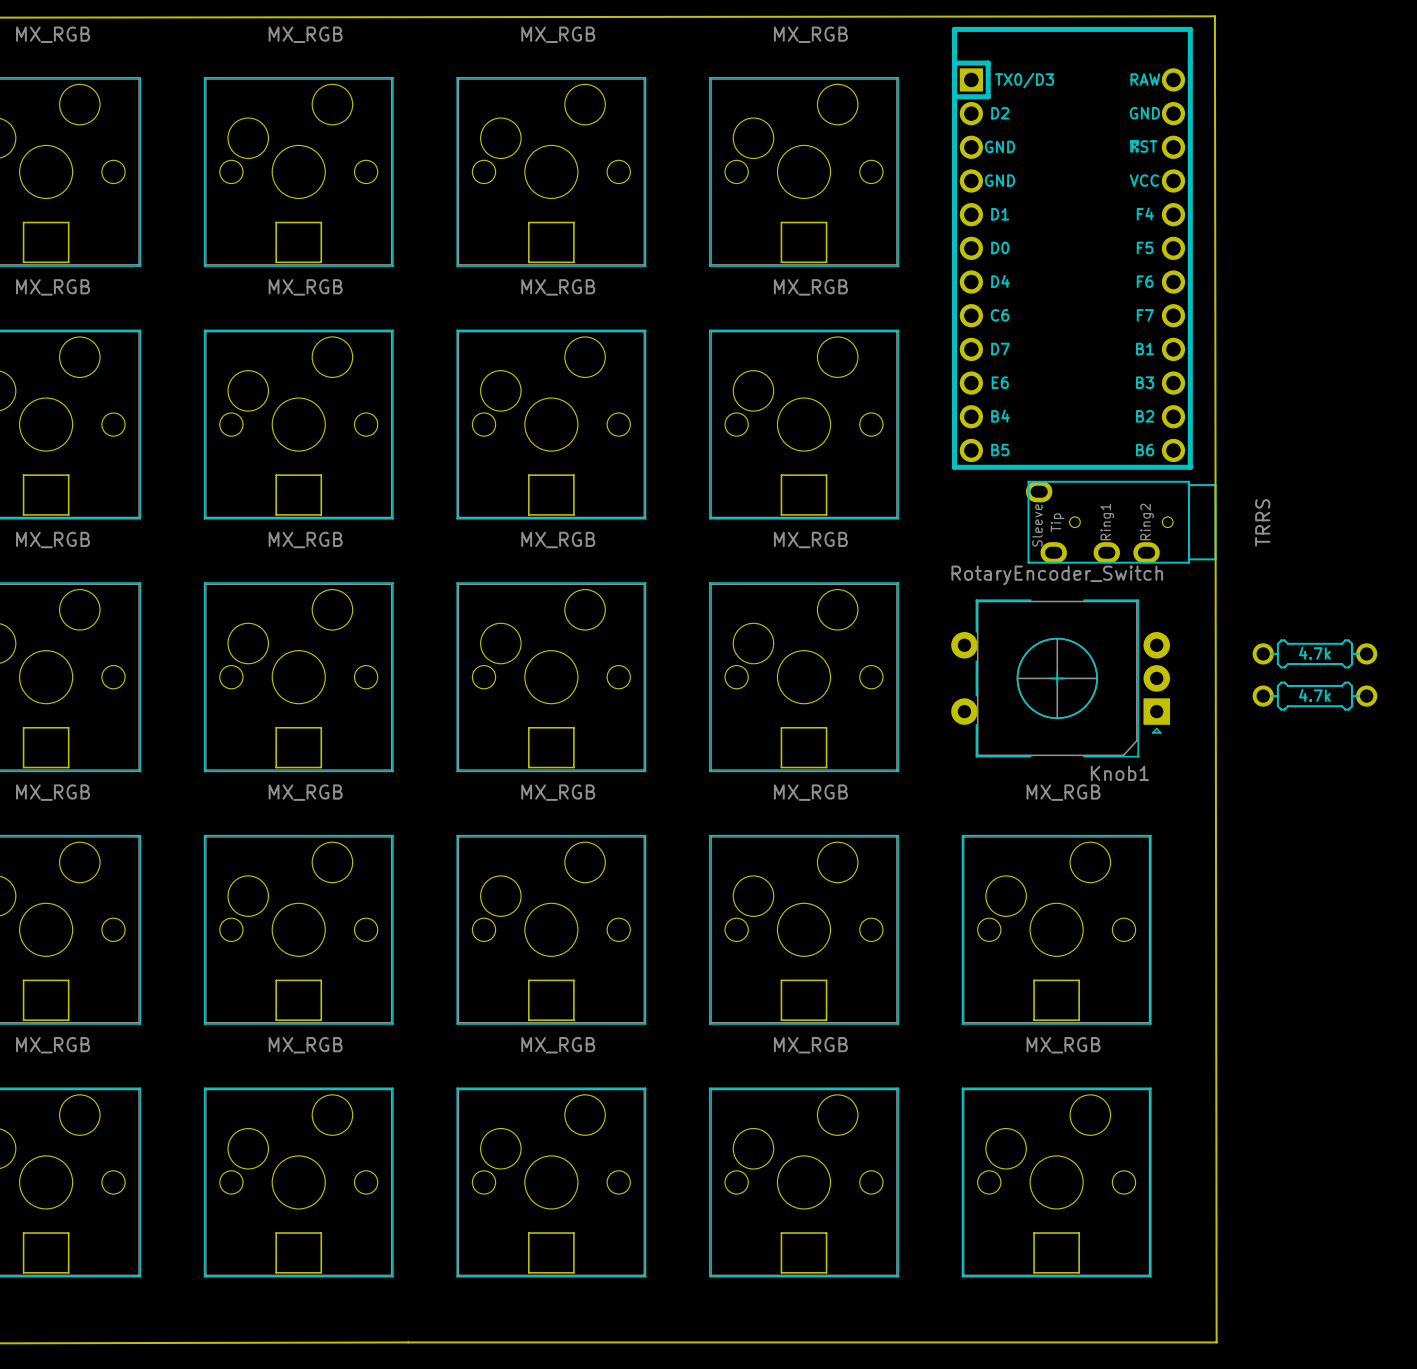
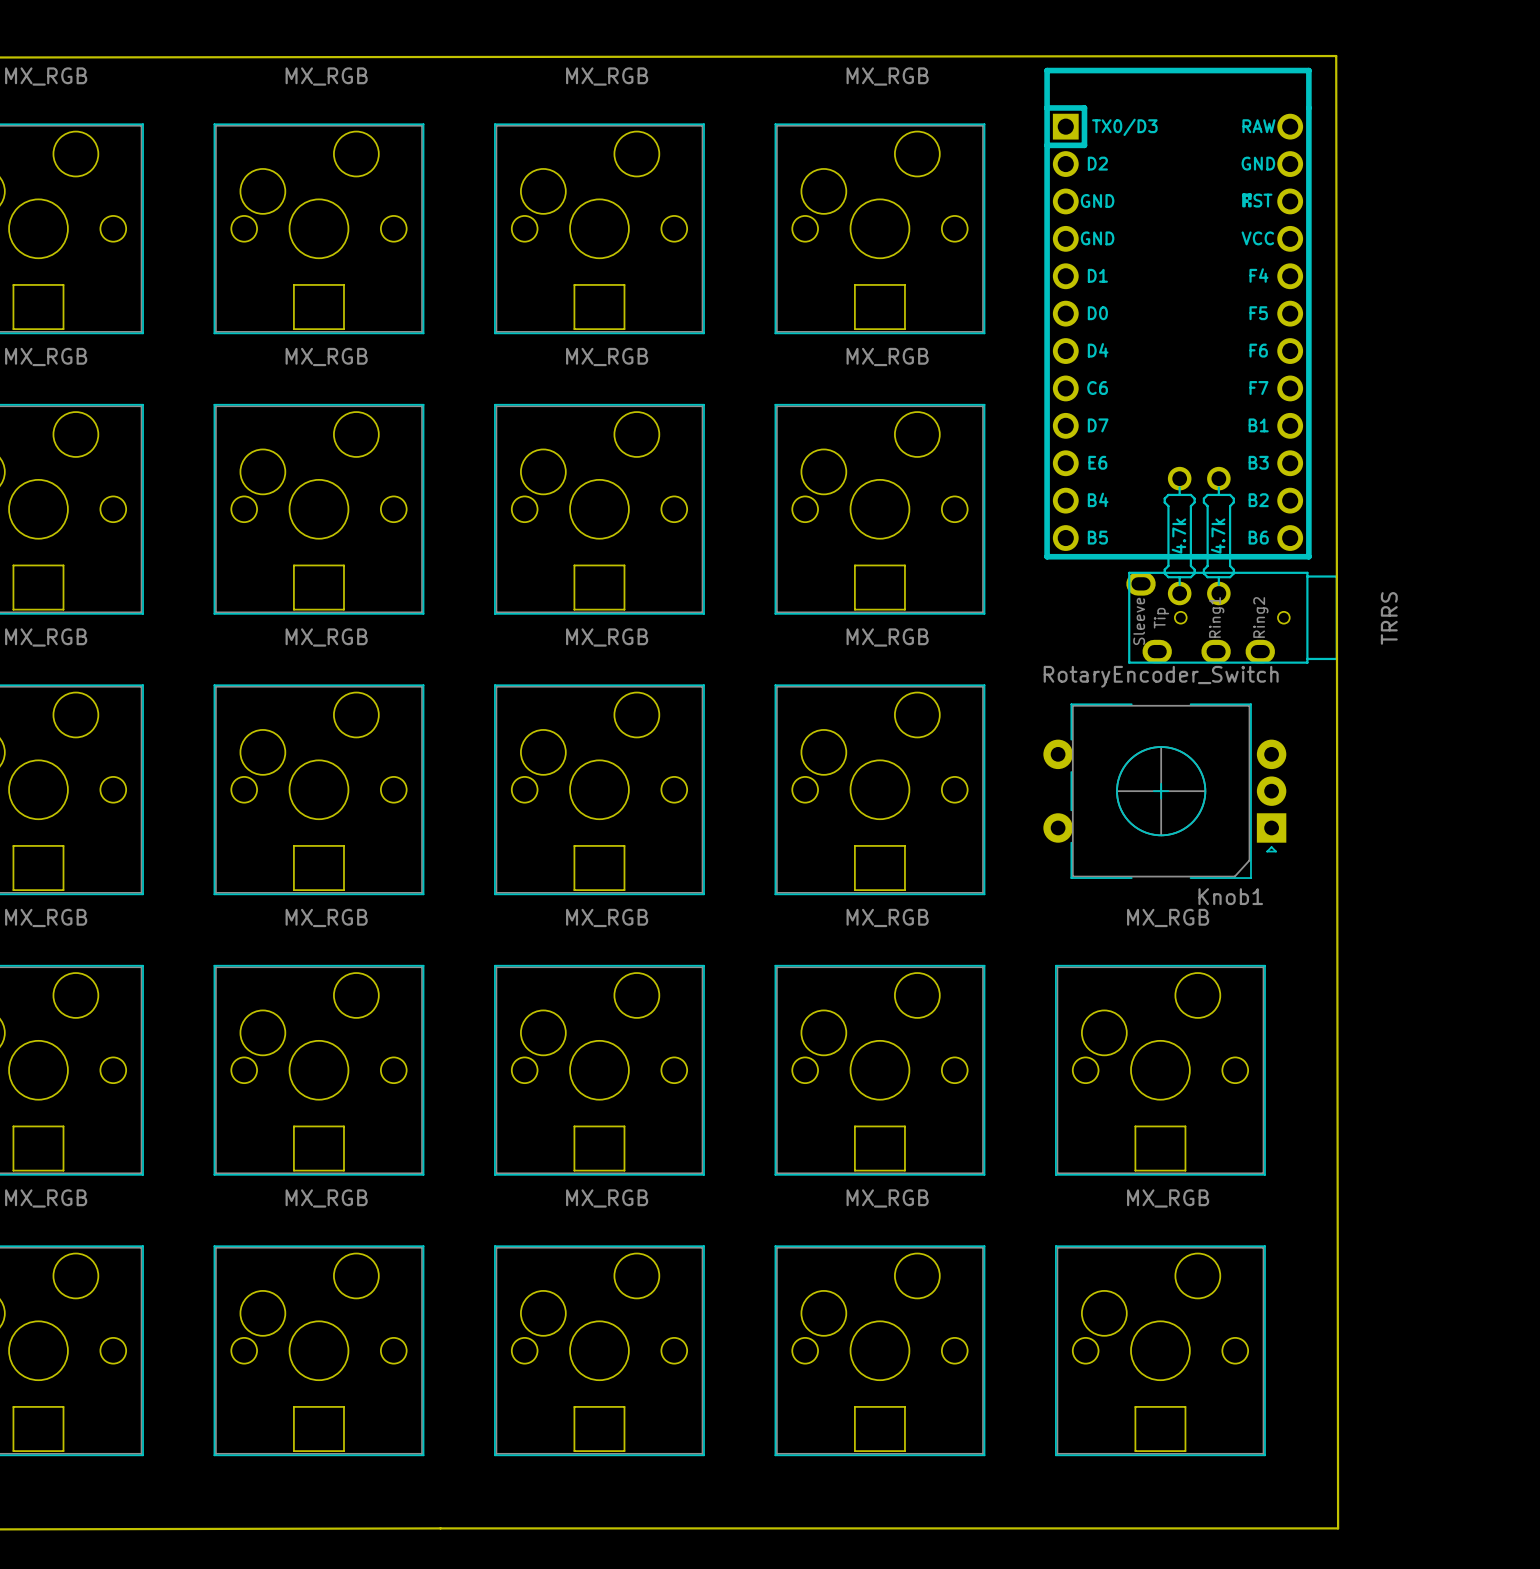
part: none -> 4.7k (1179, 536)
part: none -> 4.7k (1218, 536)
part: 4.7k (1314, 653) -> none
part: 4.7k (1314, 696) -> none

